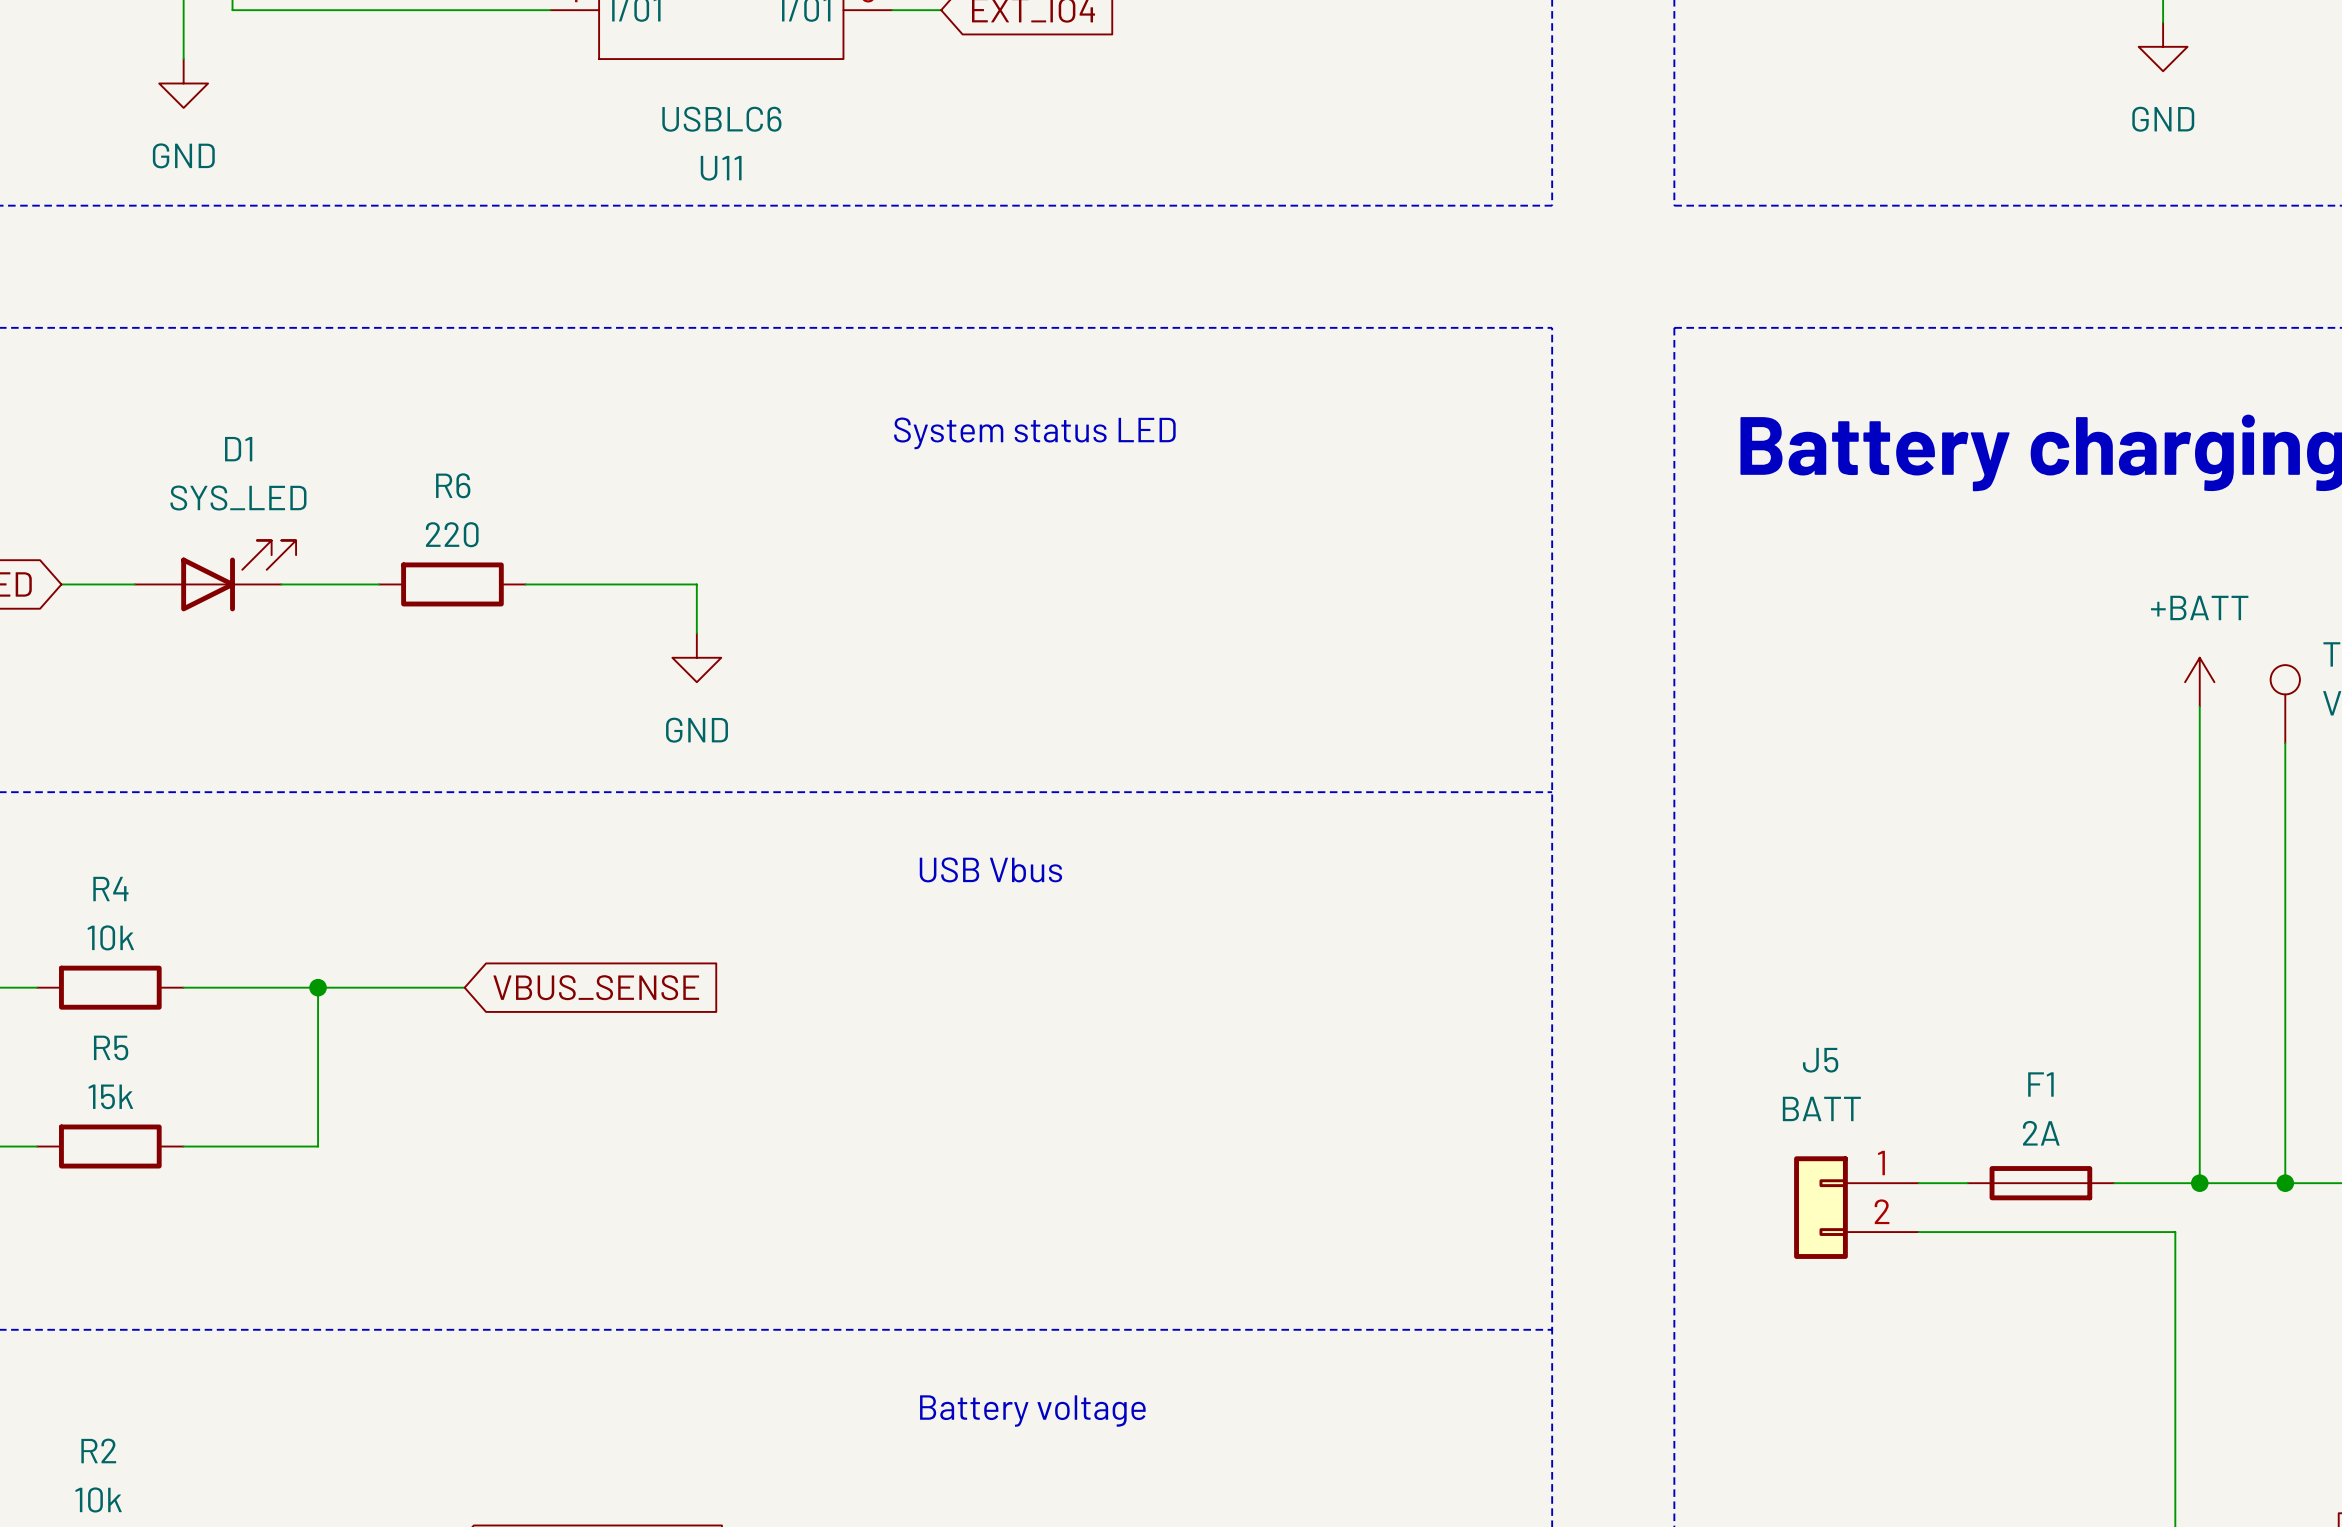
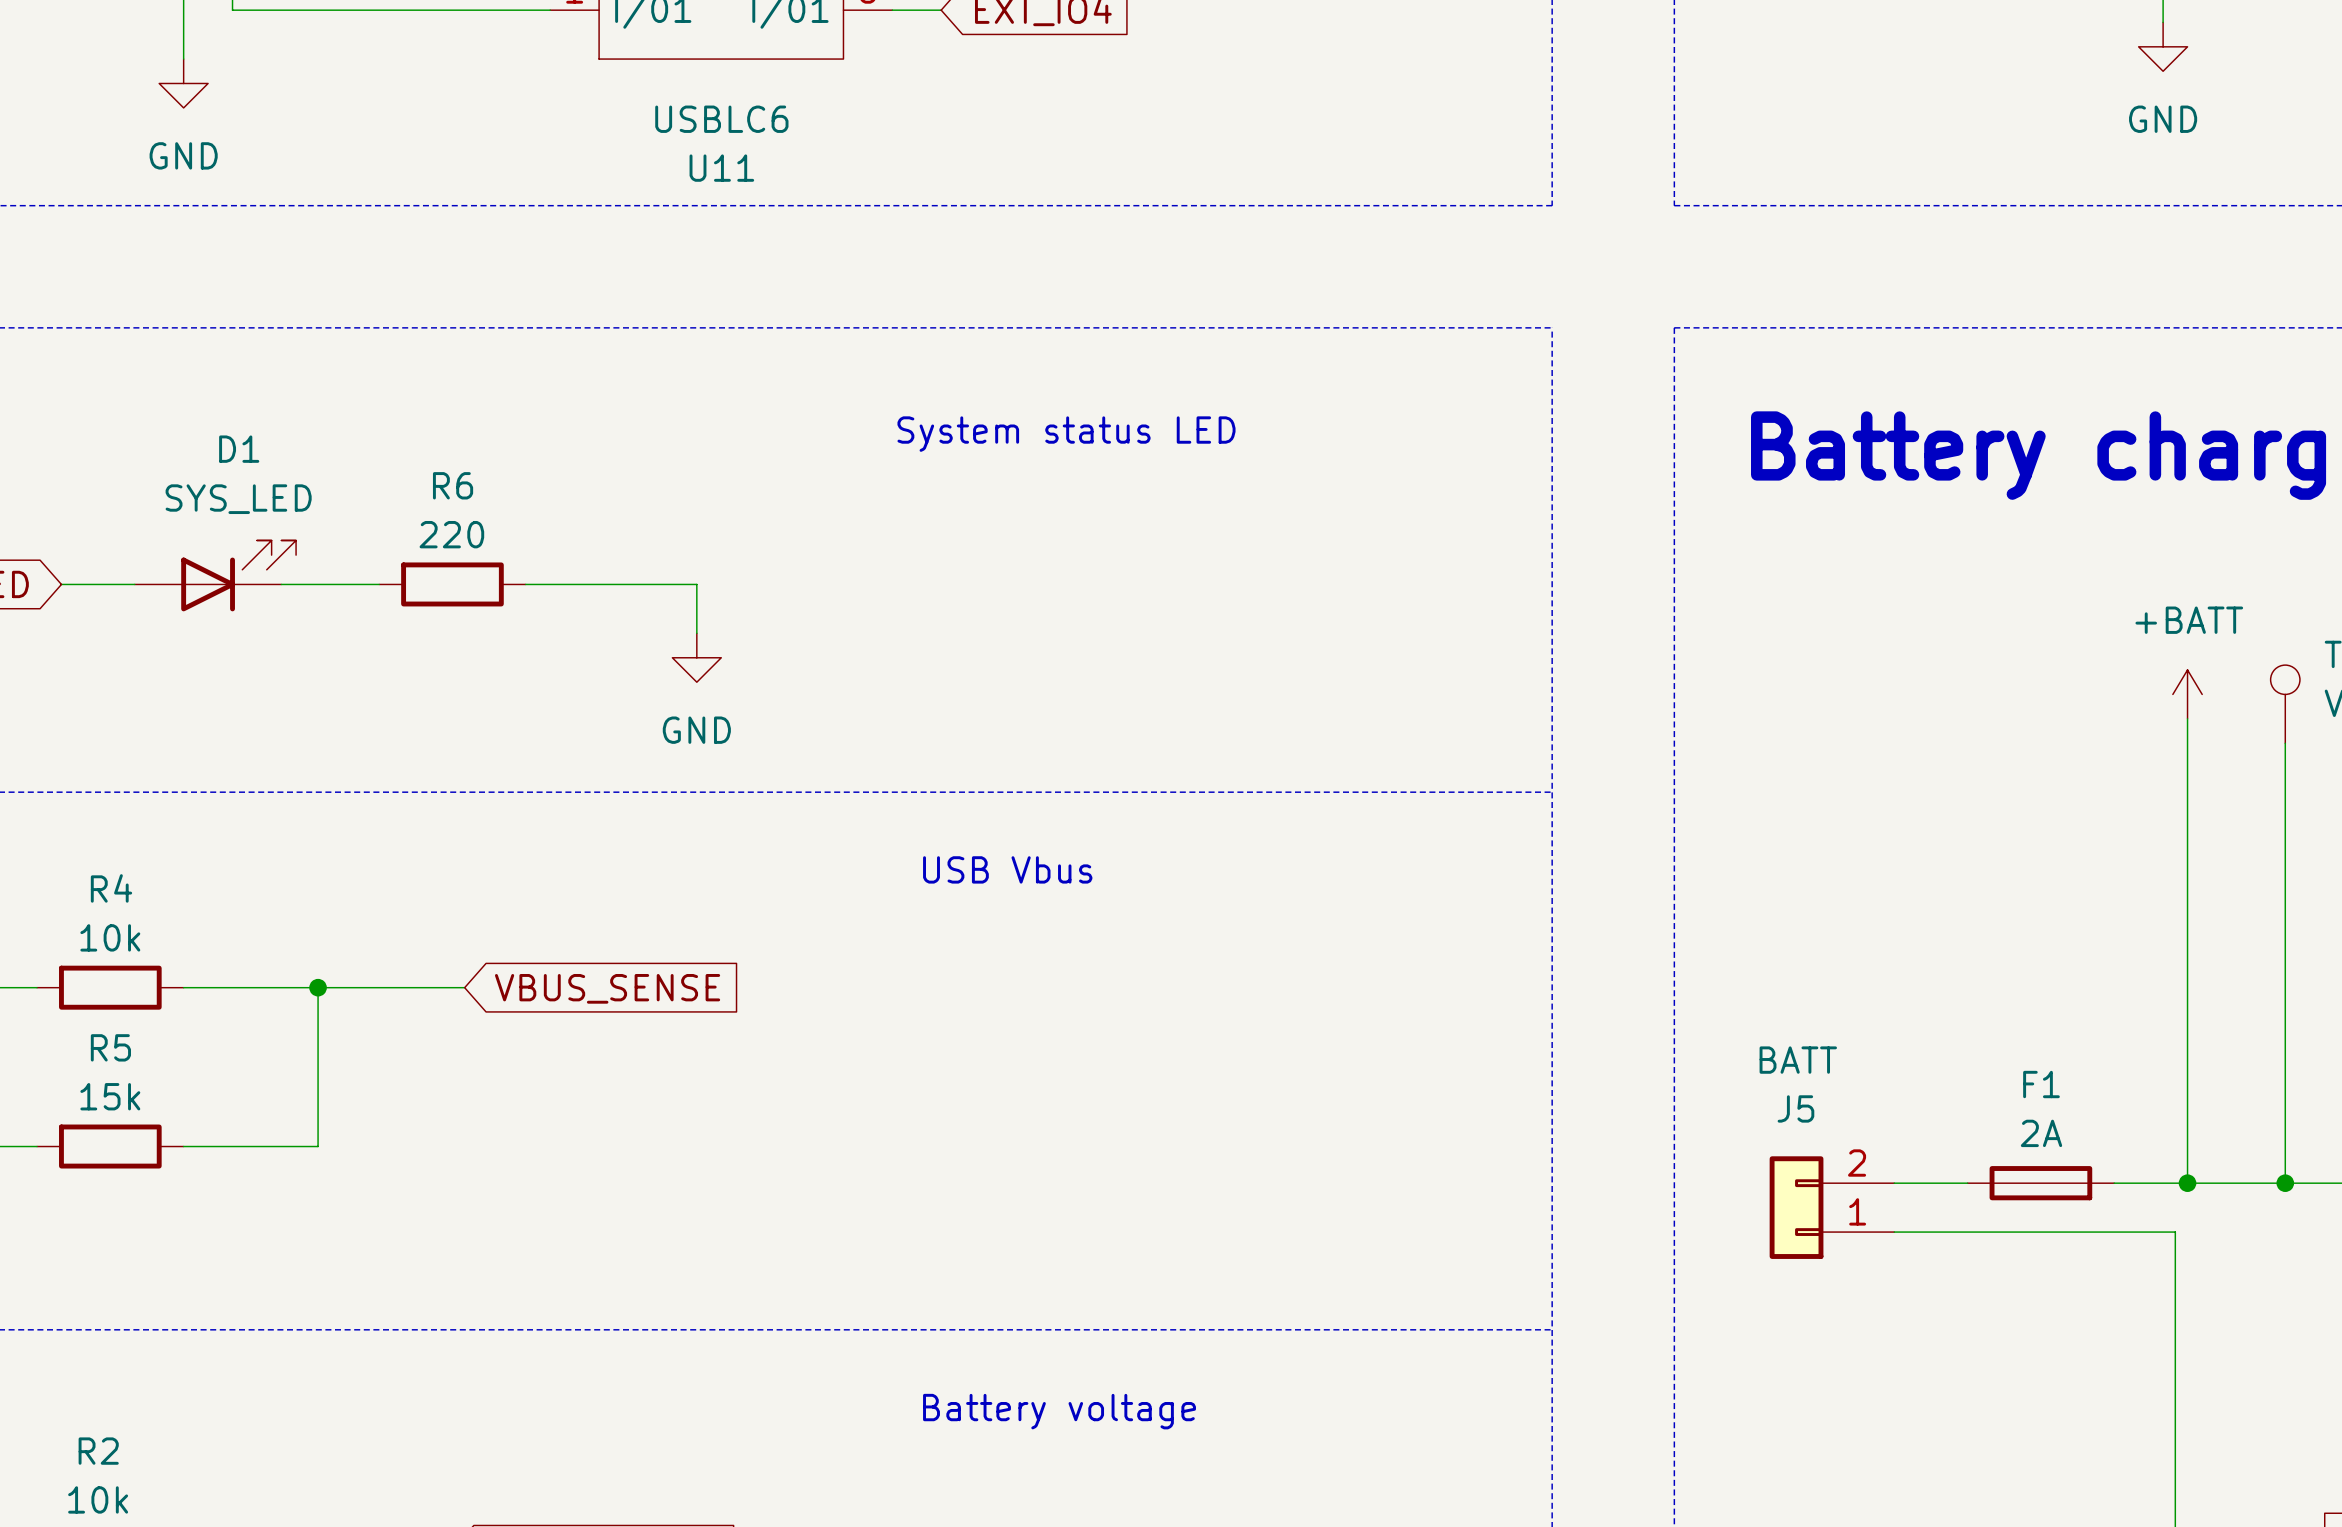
power symbol position: +BATT (2199, 682) -> +BATT (2187, 694)
wire: (2199, 706) (2199, 1183) -> none
wire: none -> (2187, 718) (2187, 1183)
J5 name position: J5 (1820, 1060) -> J5 (1795, 1108)
J5 value position: BATT (1821, 1108) -> BATT (1798, 1060)
junction position: (2199, 1183) -> (2187, 1183)
J5 flip: as is (1820, 1207) -> up-down (1796, 1207)

